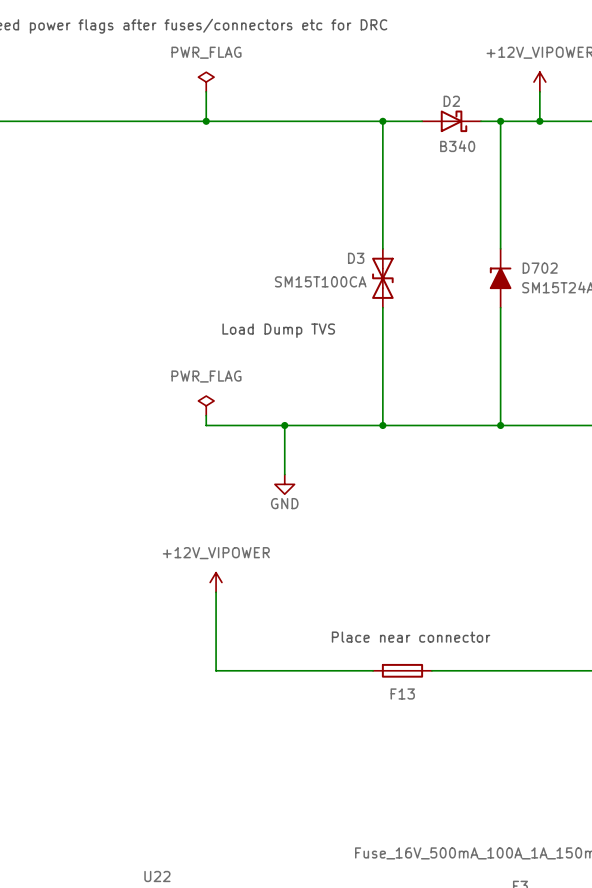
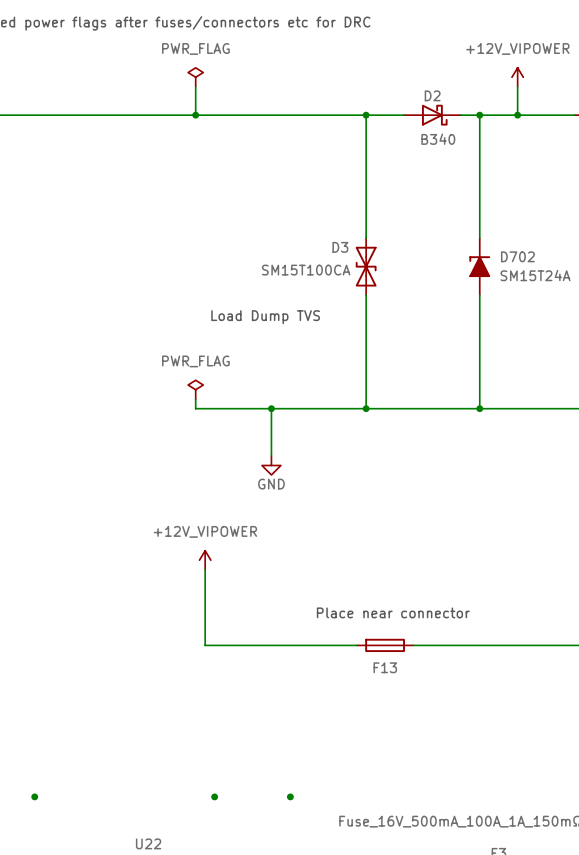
junction: none -> (34, 796)
junction: none -> (214, 796)
junction: none -> (290, 796)

